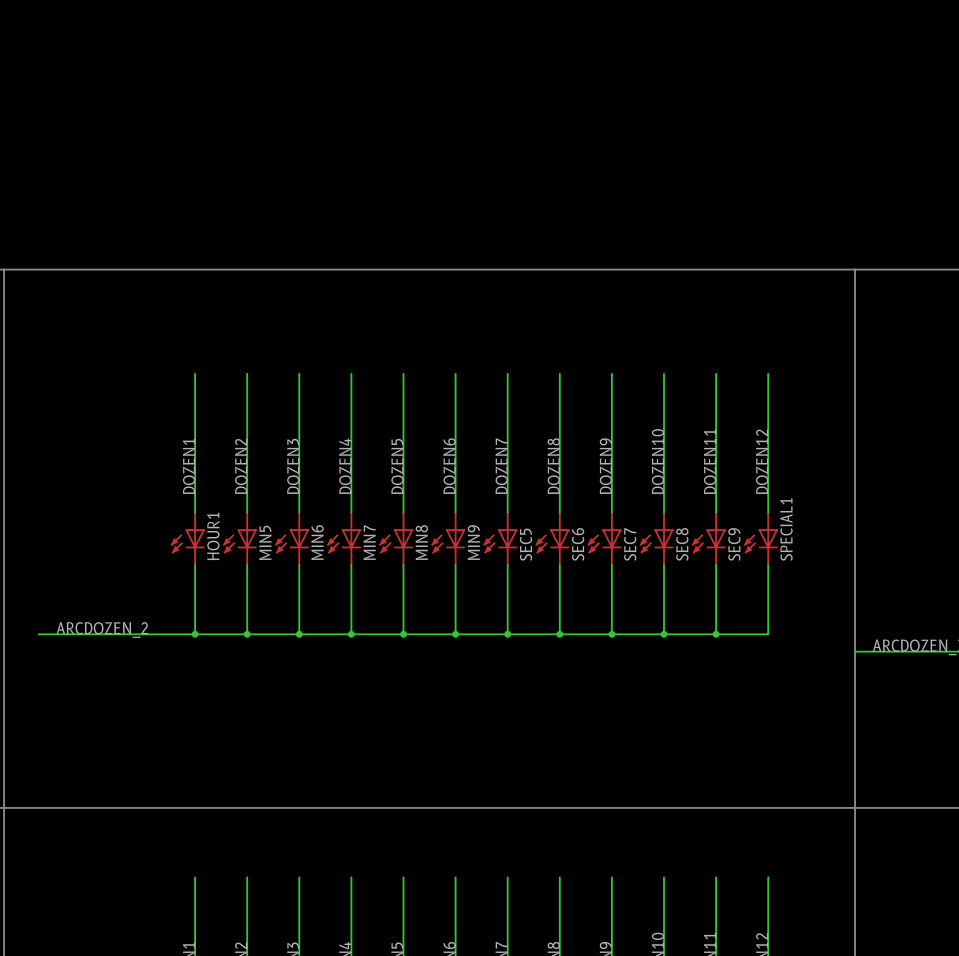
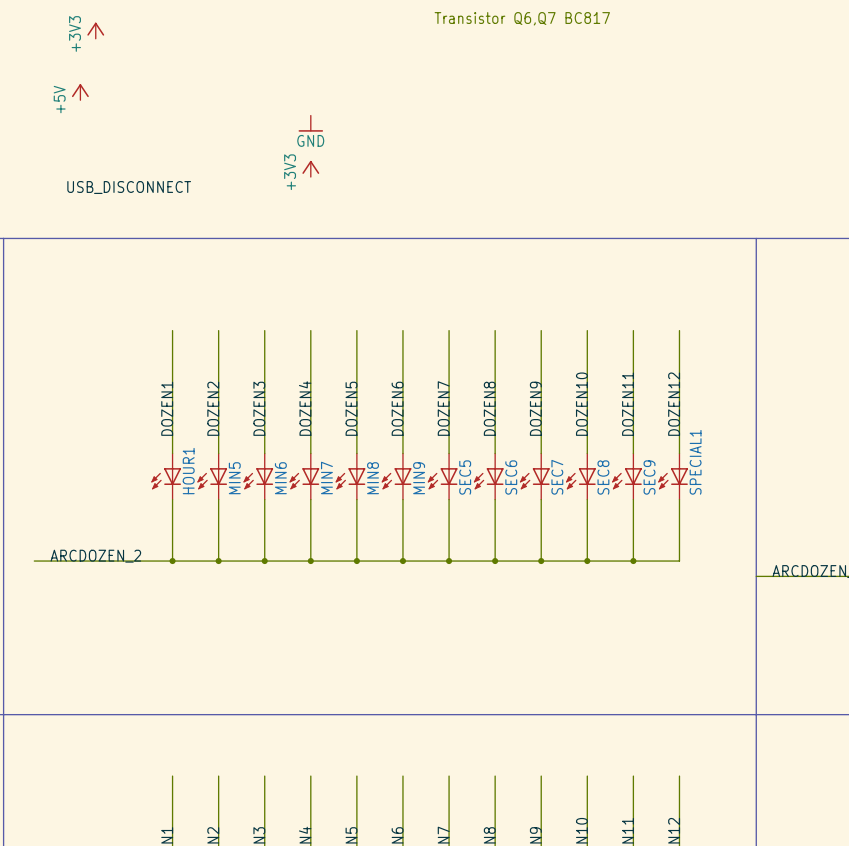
text: none -> Transistor Q6,Q7 BC817 (522, 18)
power symbol: none -> +3V3 (95, 30)
power symbol: none -> +5V (80, 92)
power symbol: none -> GND (310, 123)
power symbol: none -> +3V3 (310, 168)
label: none -> USB_DISCONNECT (129, 187)

